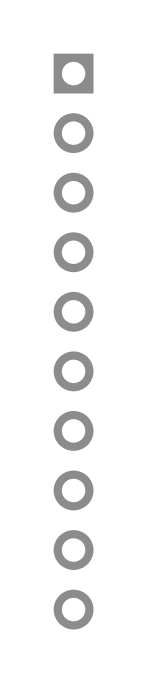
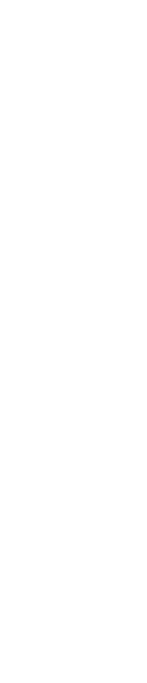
part: (73, 341) -> none

